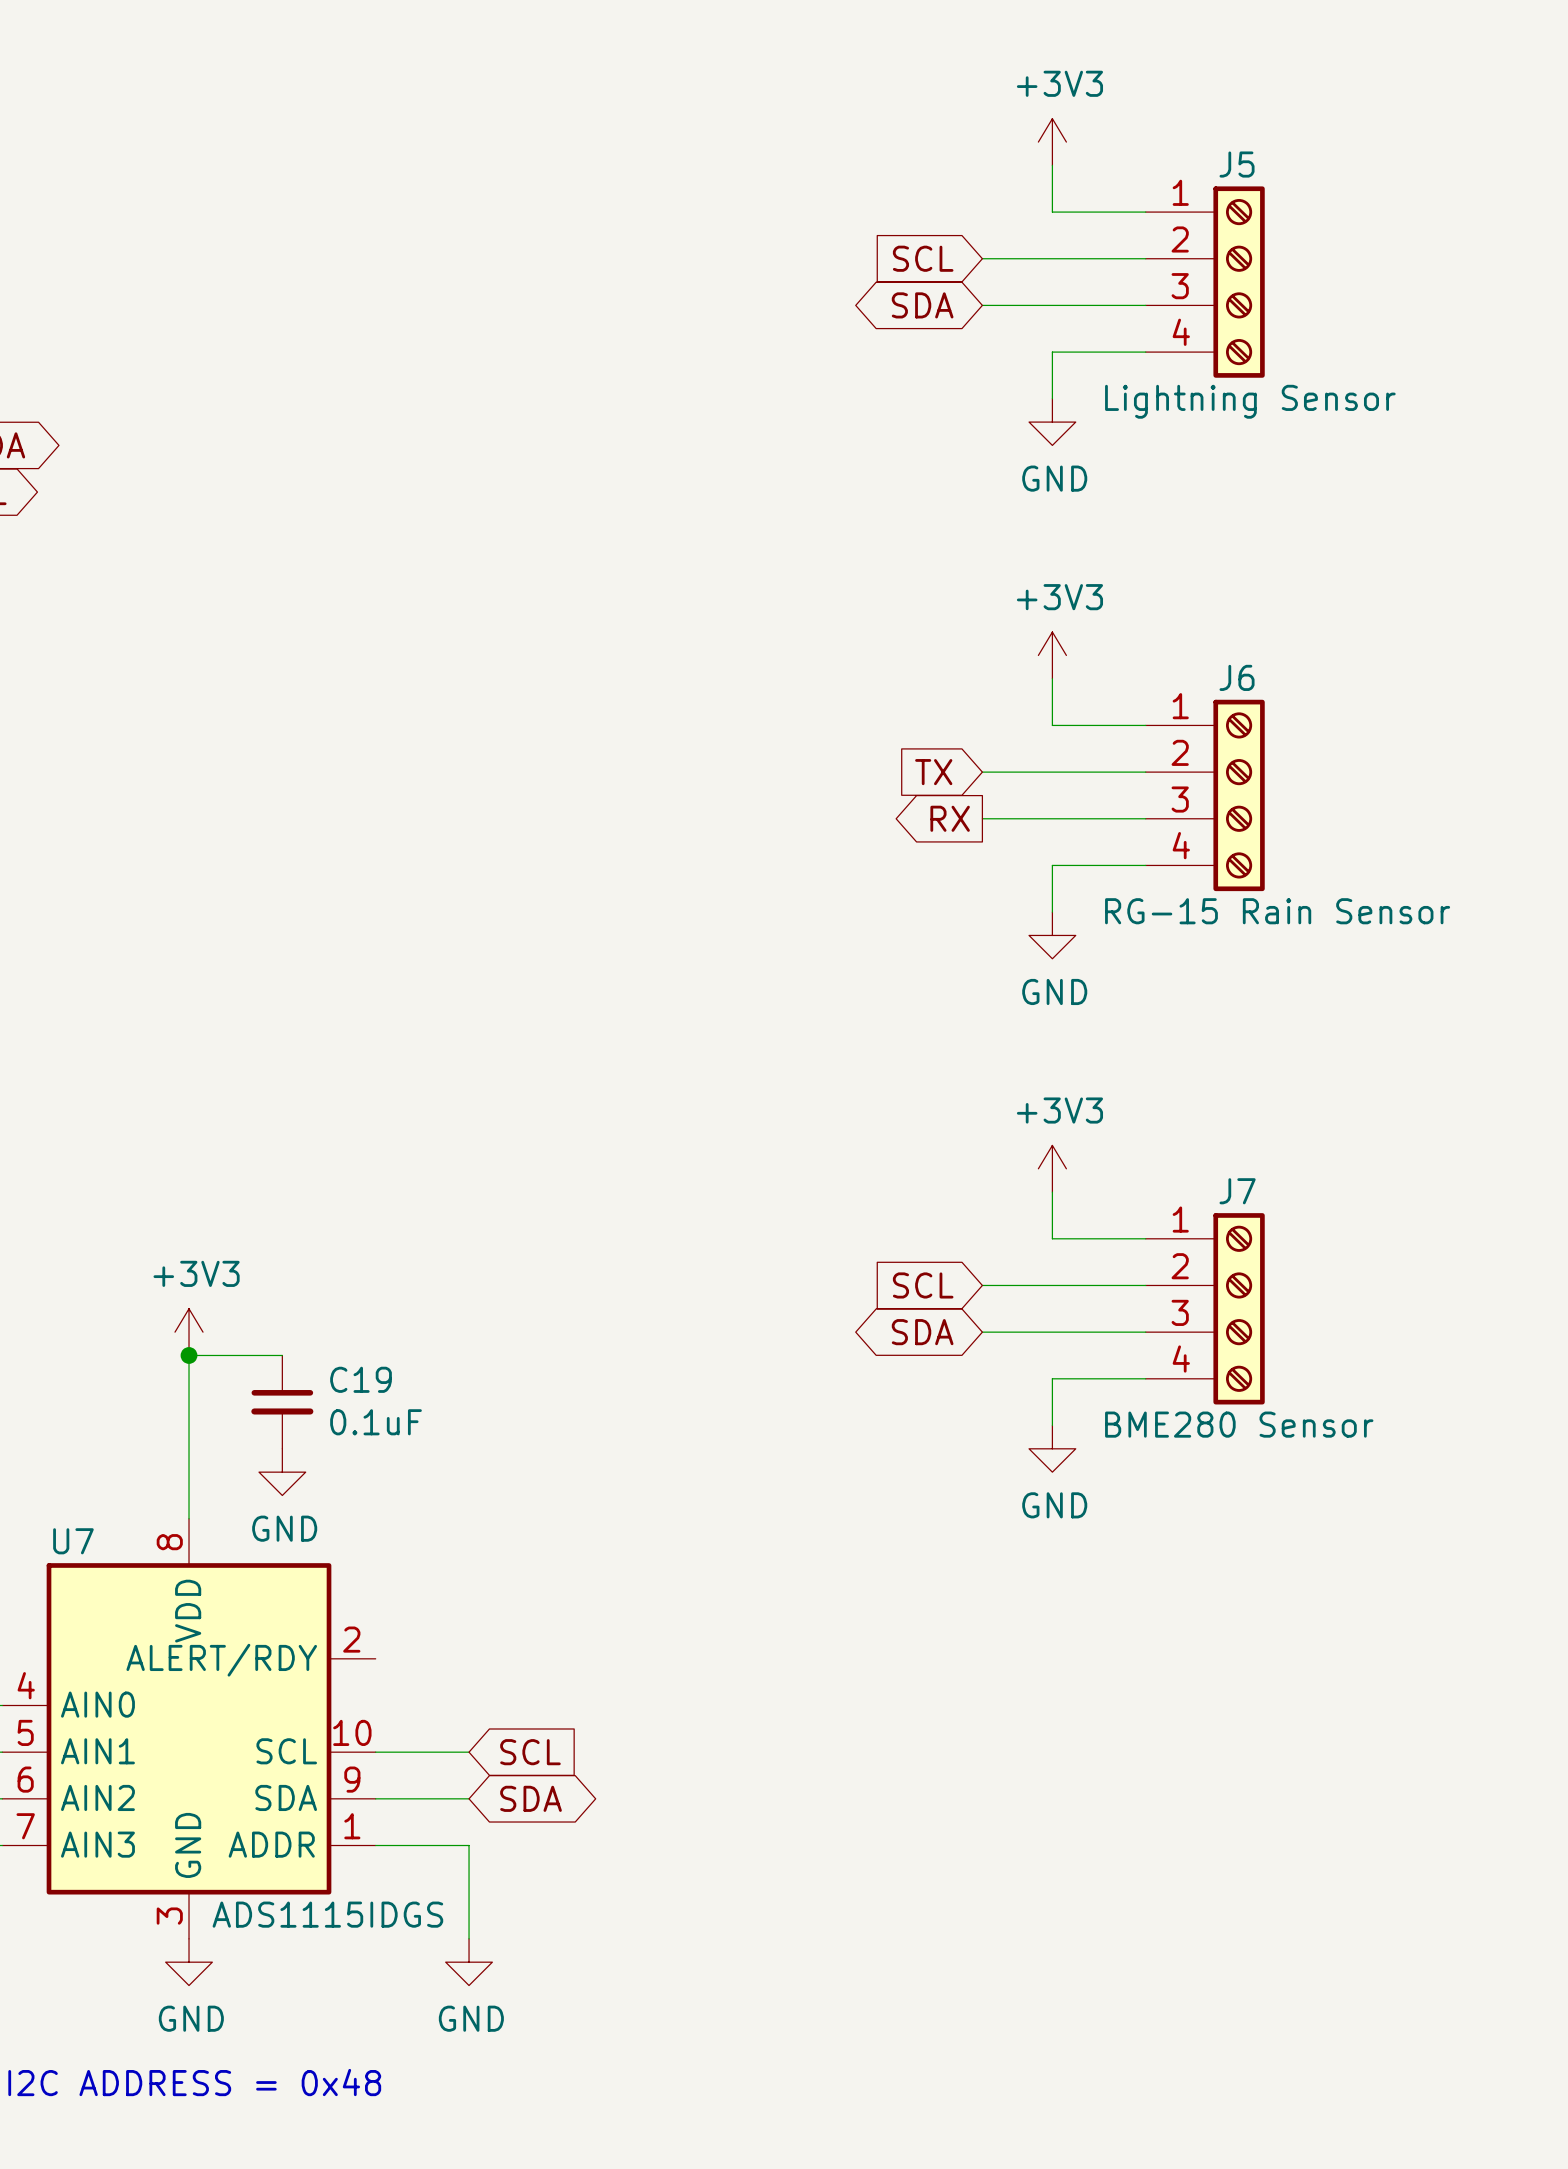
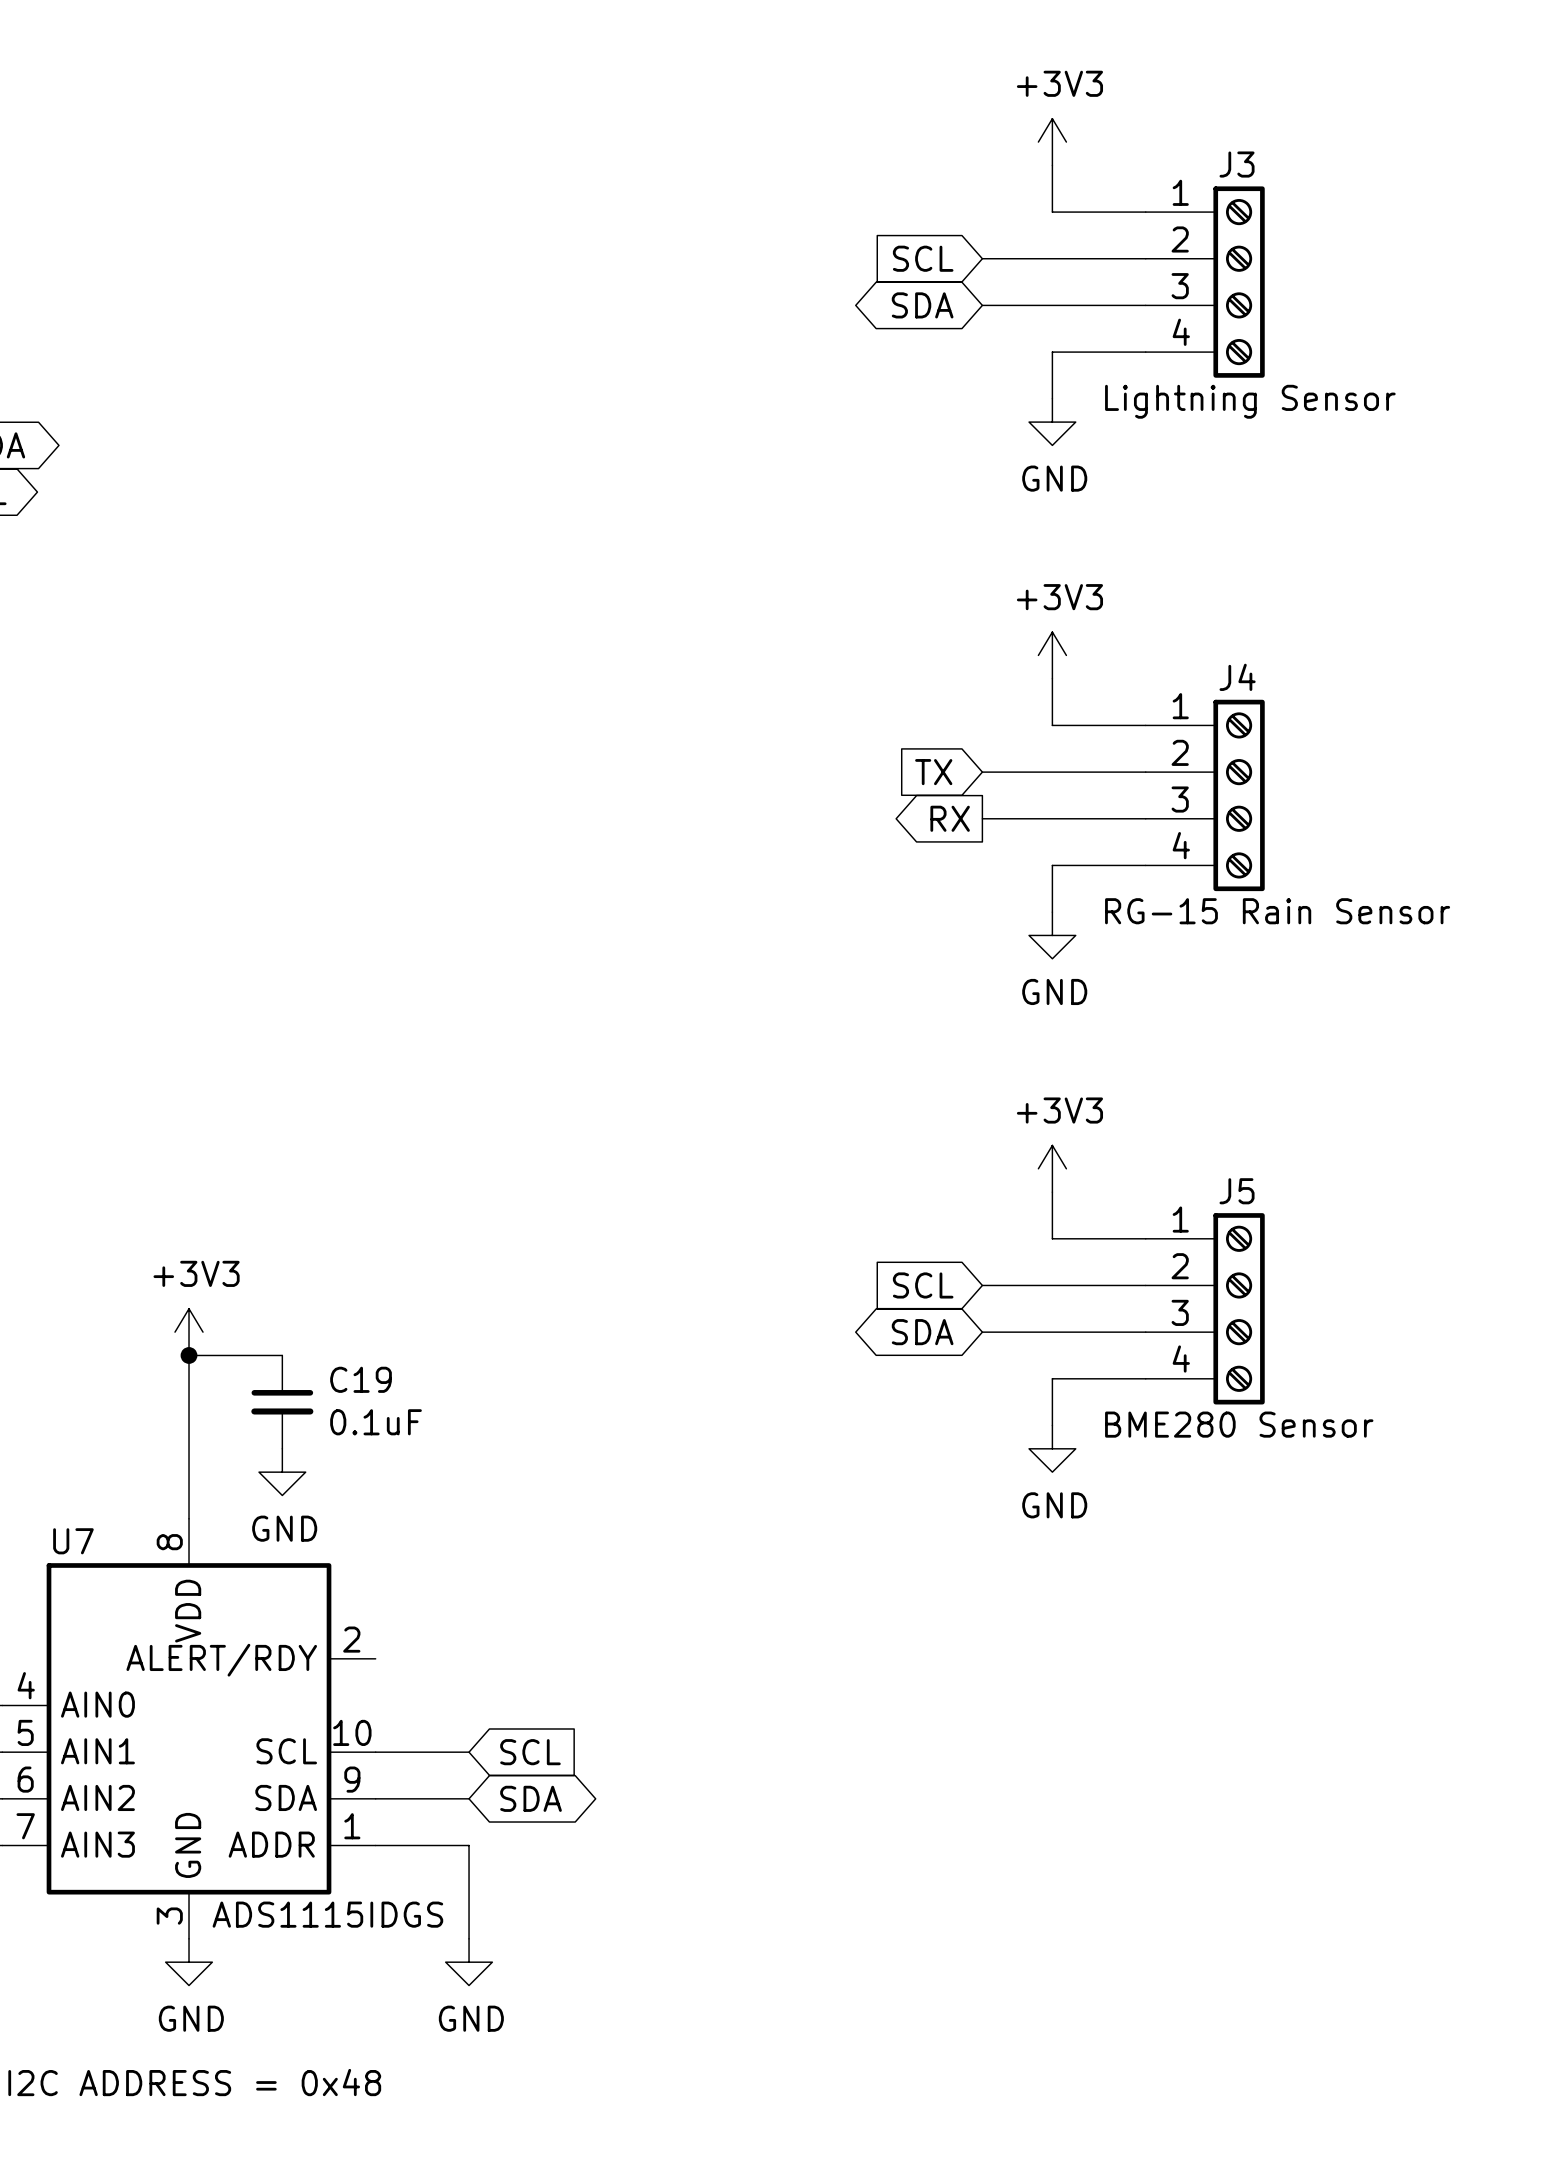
J5 name: J5 (1237, 164) -> J3 (1237, 164)
J6 name: J6 (1237, 677) -> J4 (1237, 677)
J7 name: J7 (1237, 1191) -> J5 (1237, 1191)

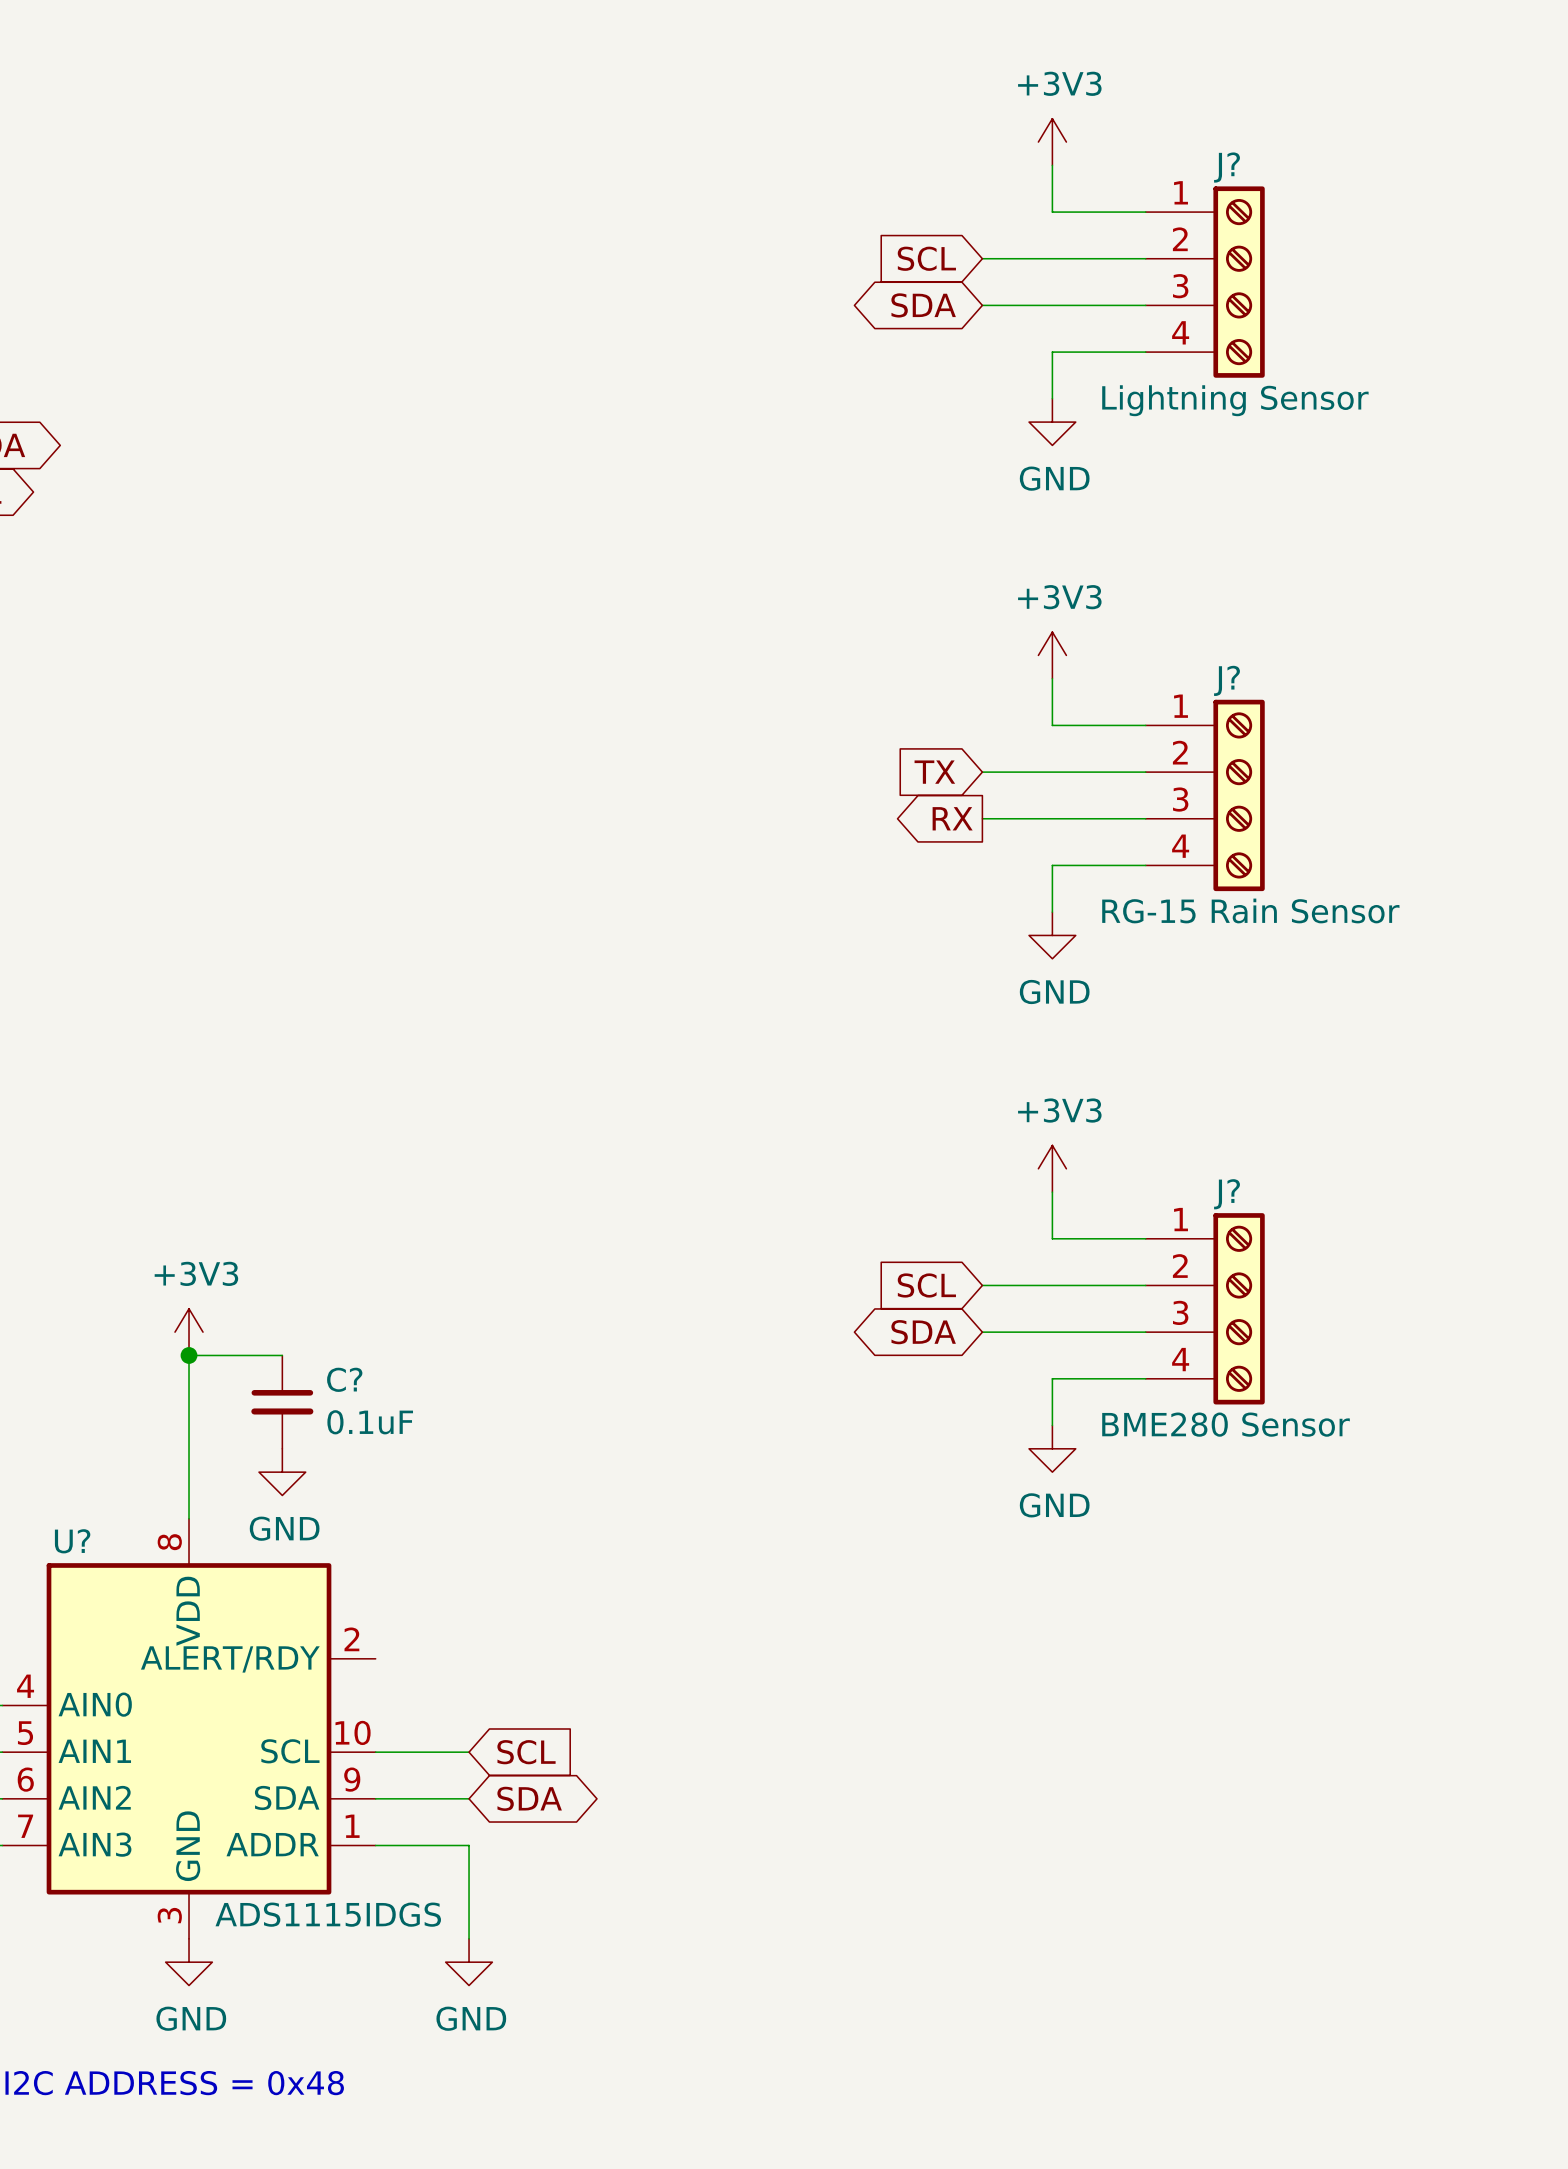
J3 name: J3 (1237, 164) -> J? (1227, 167)
J4 name: J4 (1237, 677) -> J? (1227, 680)
J5 name: J5 (1237, 1191) -> J? (1227, 1194)
C19 name: C19 (361, 1379) -> C? (344, 1379)
U7 name: U7 (73, 1541) -> U? (72, 1541)

